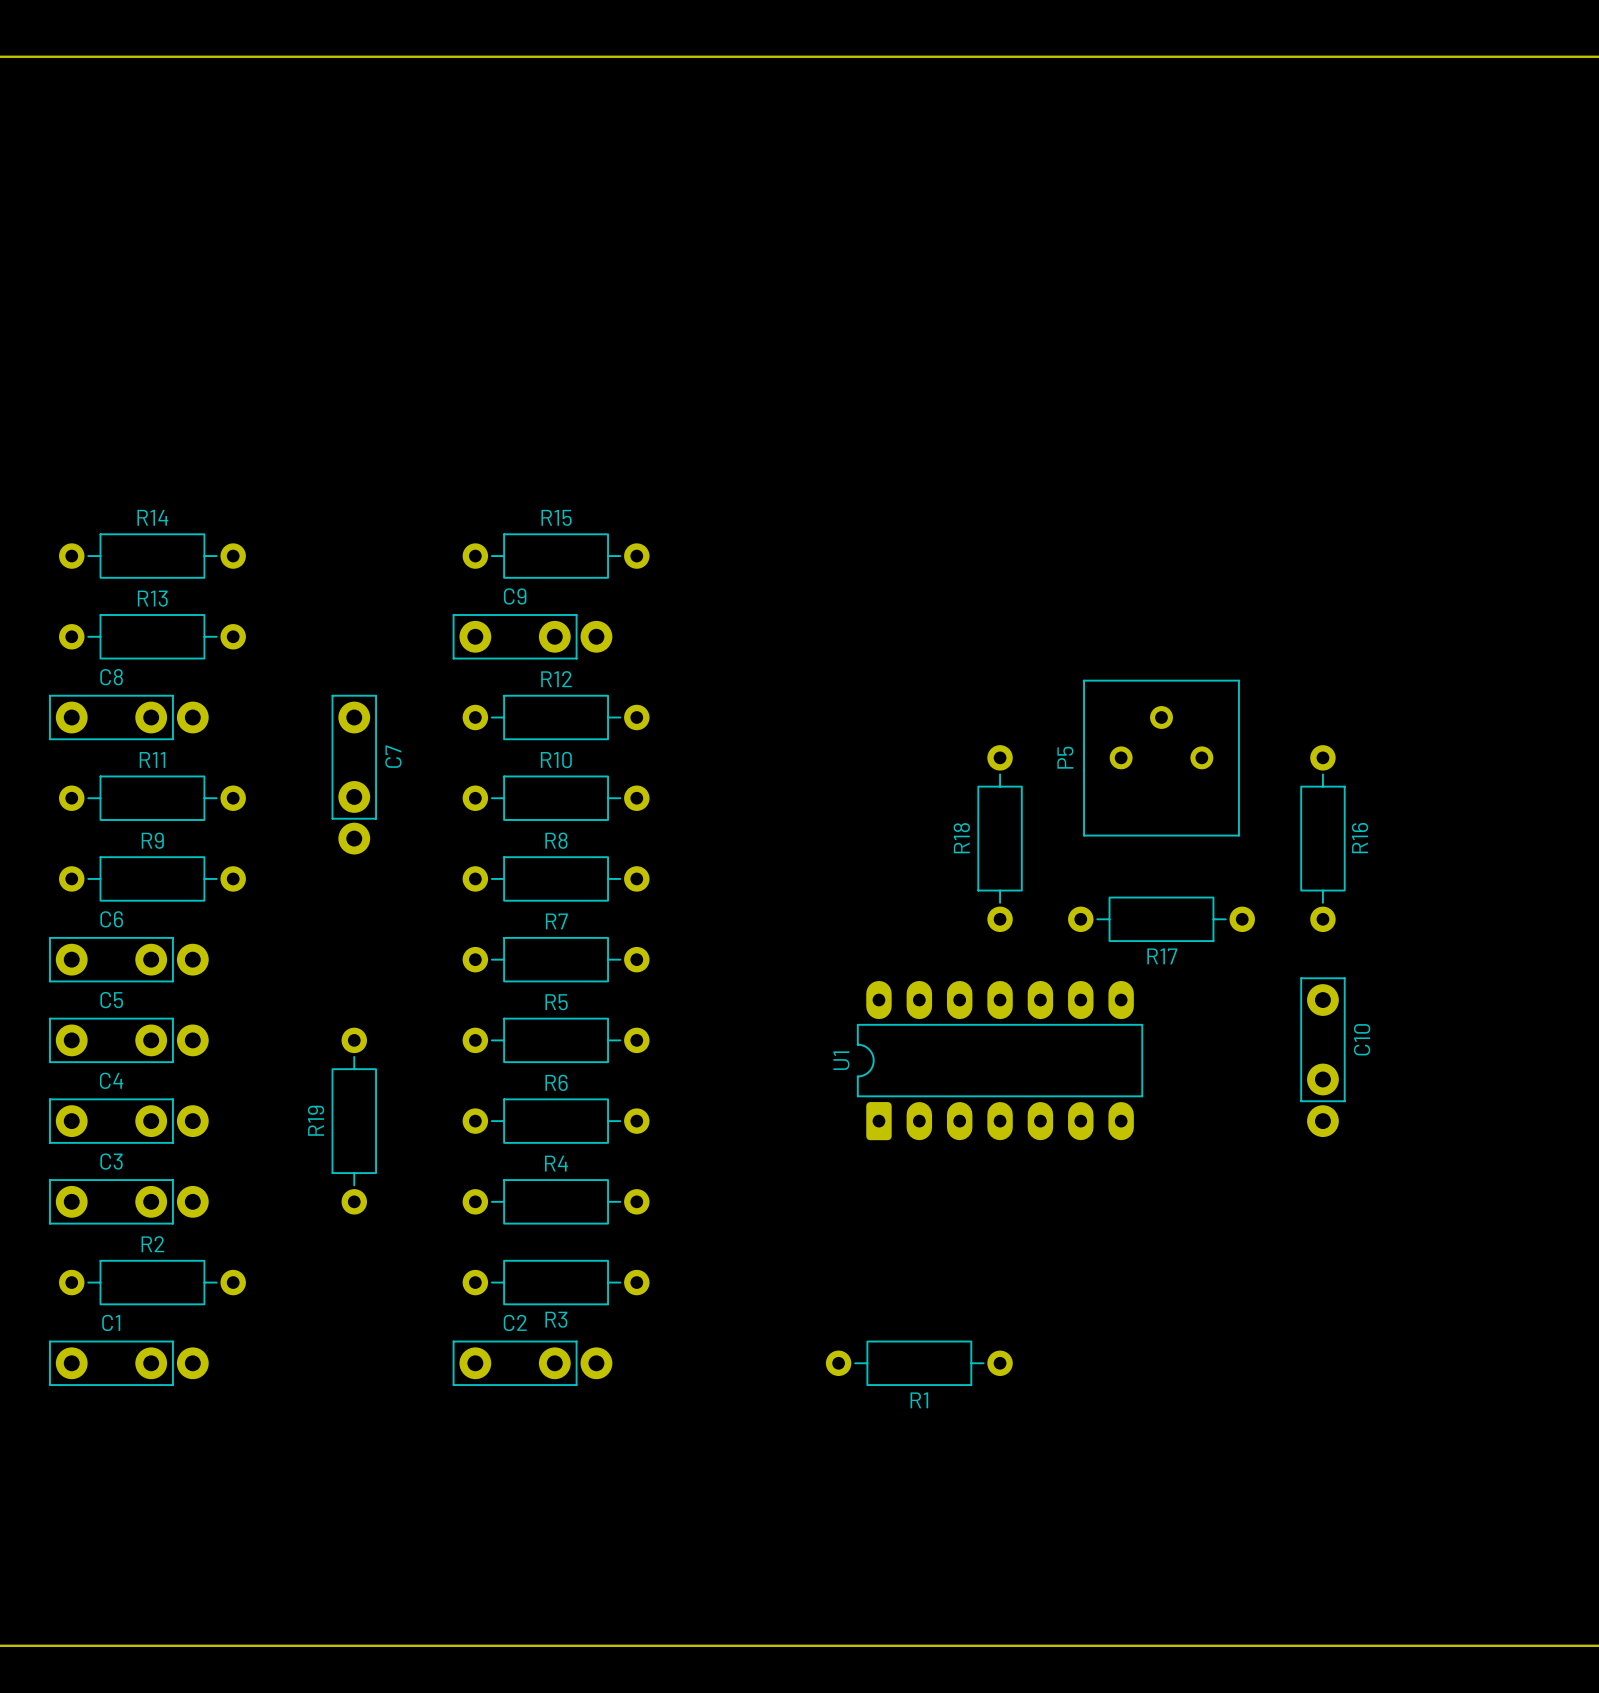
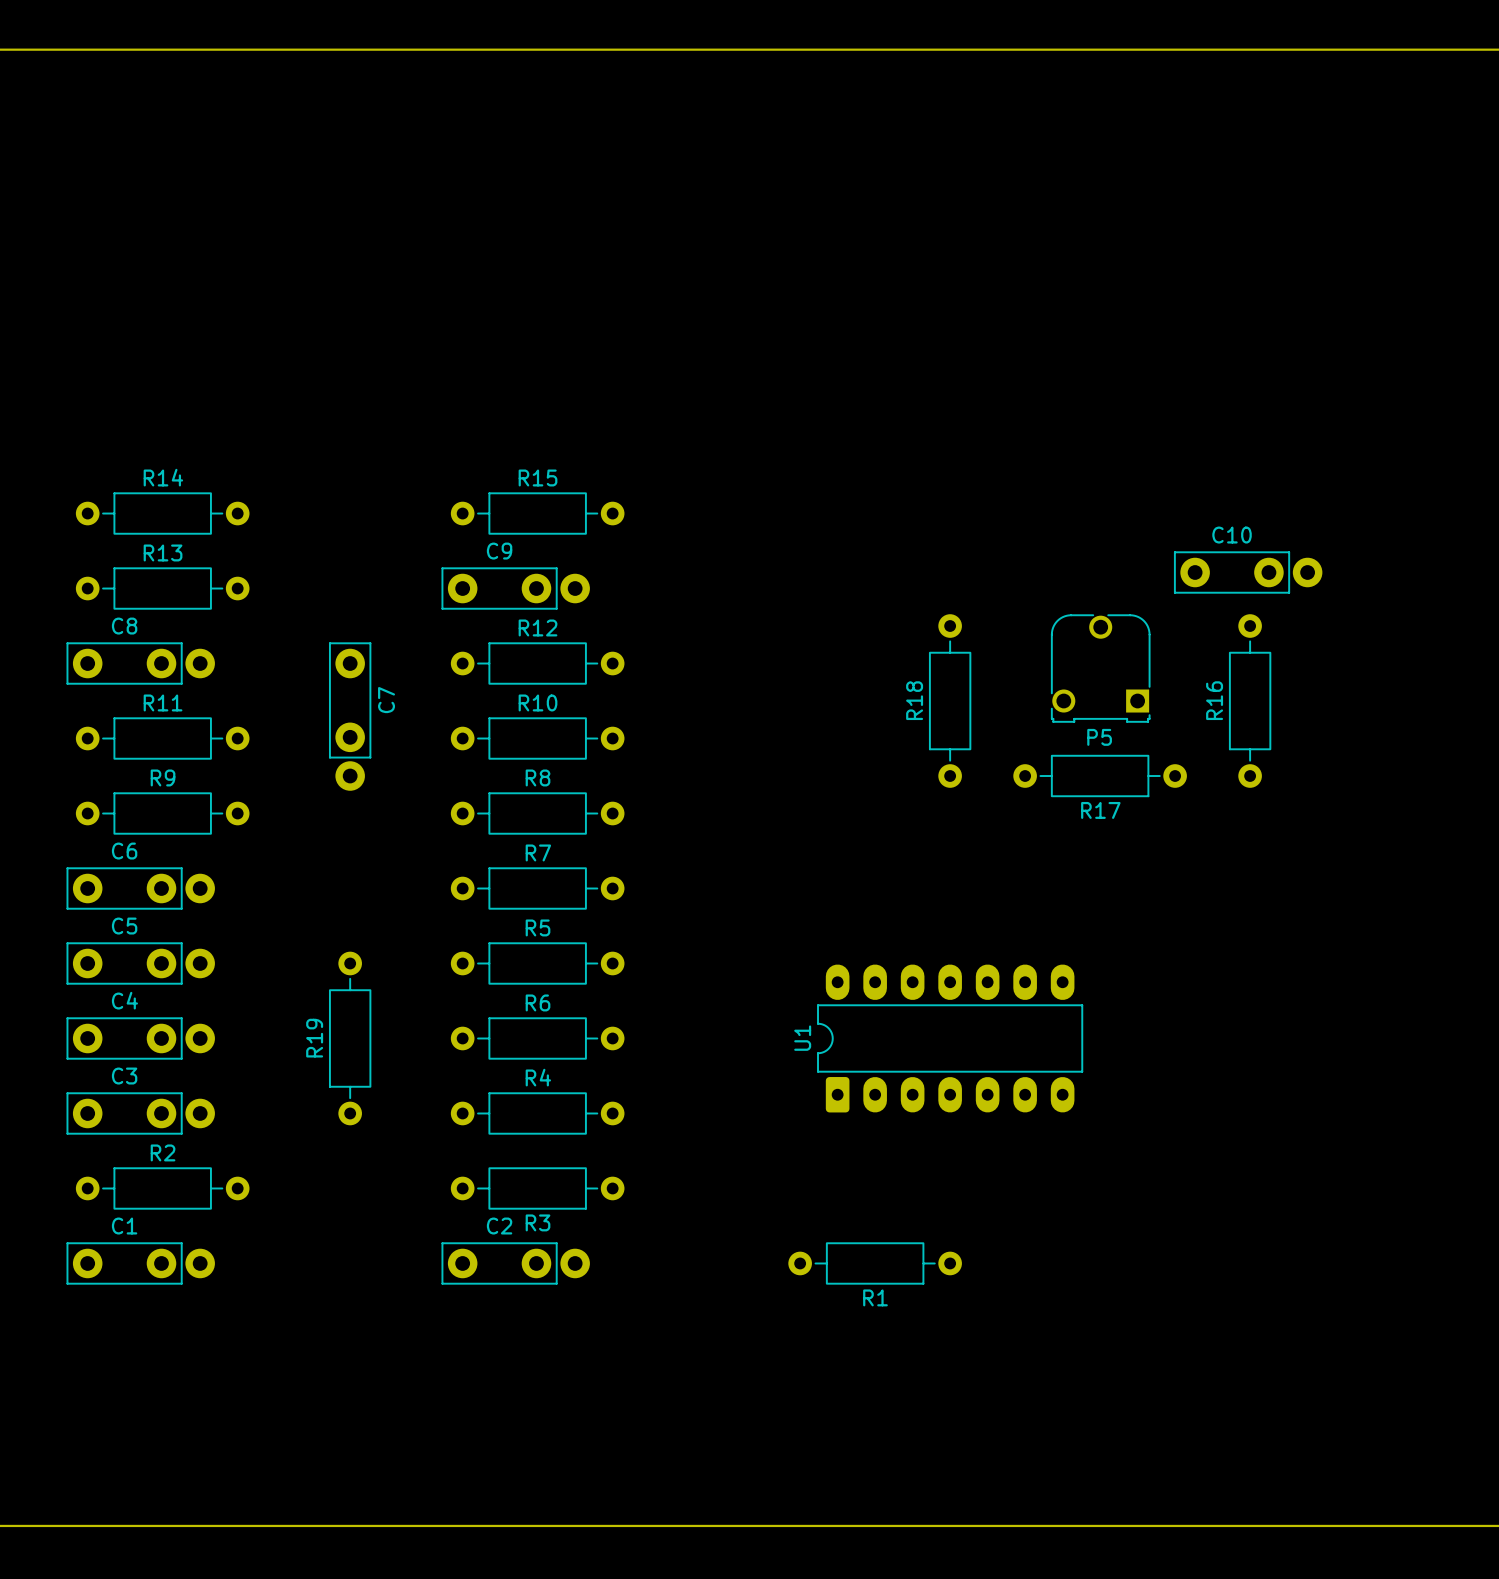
P5 footprint: [1083, 679, 1240, 837] -> [1050, 614, 1151, 723]
P5 name position: P5 (1065, 757) -> P5 (1099, 737)
R18 position: (1000, 838) -> (950, 701)
R16 position: (1322, 838) -> (1250, 701)
R16 name position: R16 (1360, 838) -> R16 (1214, 700)
R17 position: (1161, 919) -> (1100, 776)
C10 rotation: 0° (1322, 1057) -> 90° counterclockwise (1248, 572)
C10 position: (1322, 1057) -> (1248, 572)
U1 position: (1000, 1060) -> (950, 1038)

